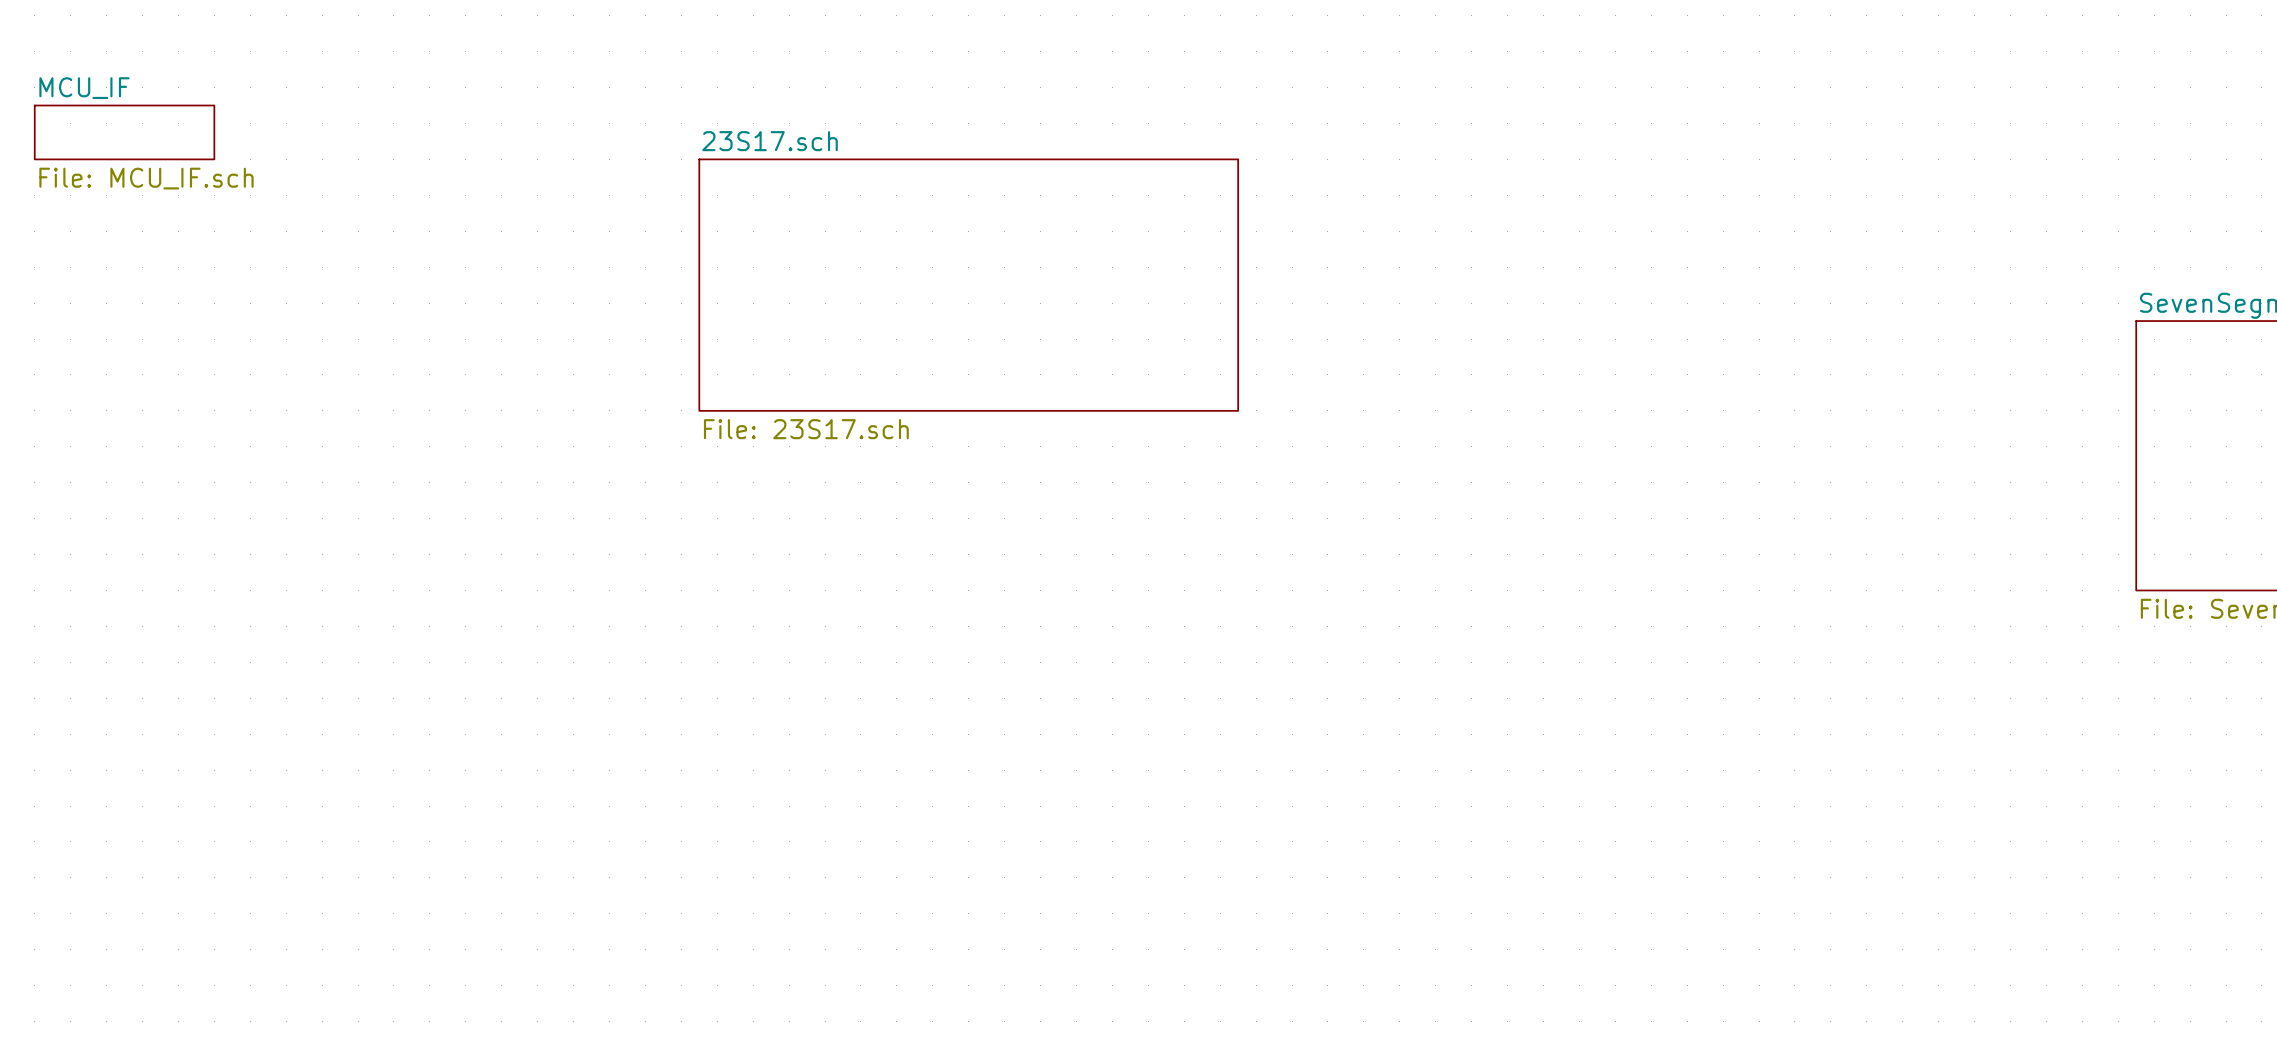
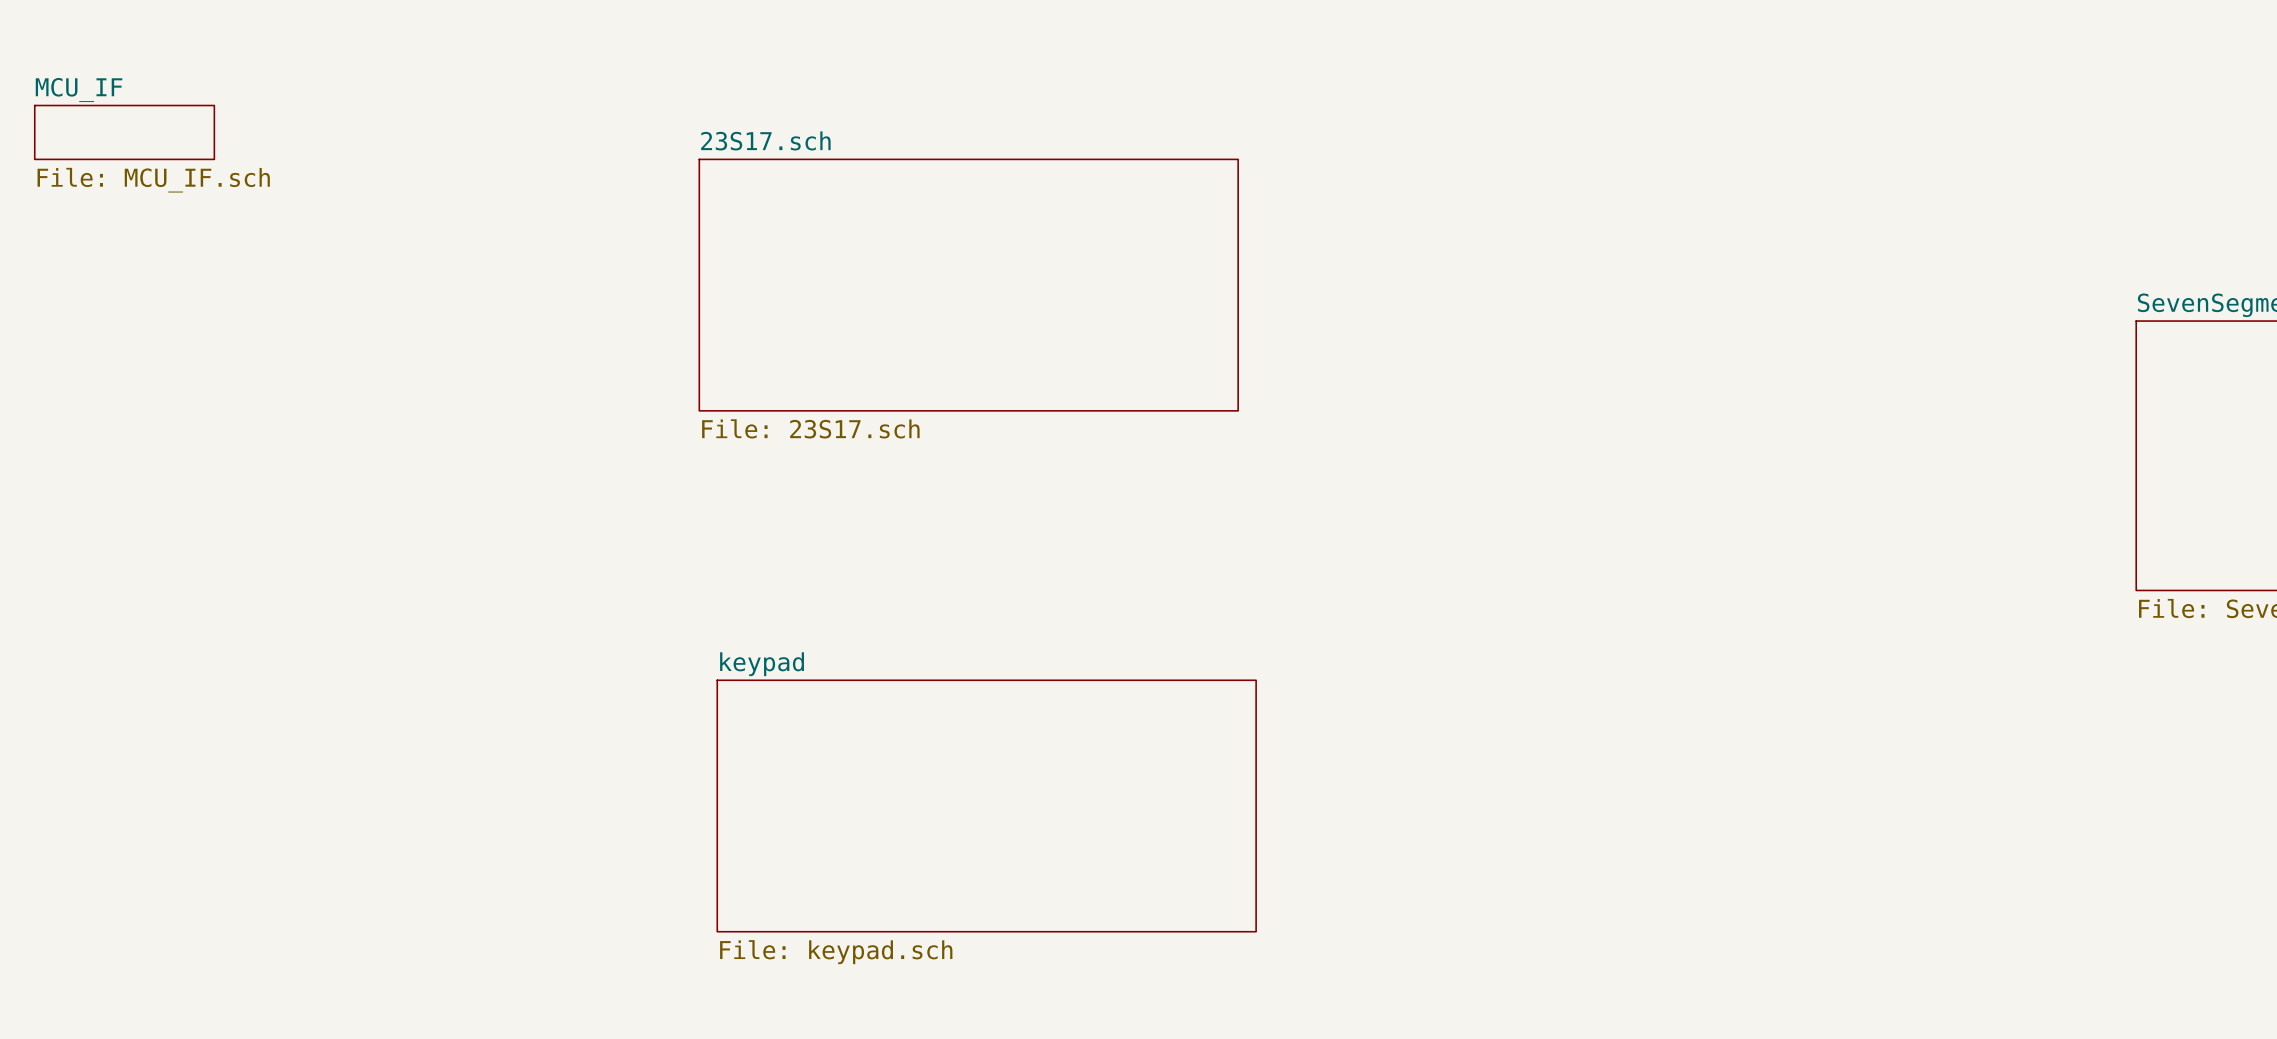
sheet keypad: none -> File: keypad.sch (986, 806)

